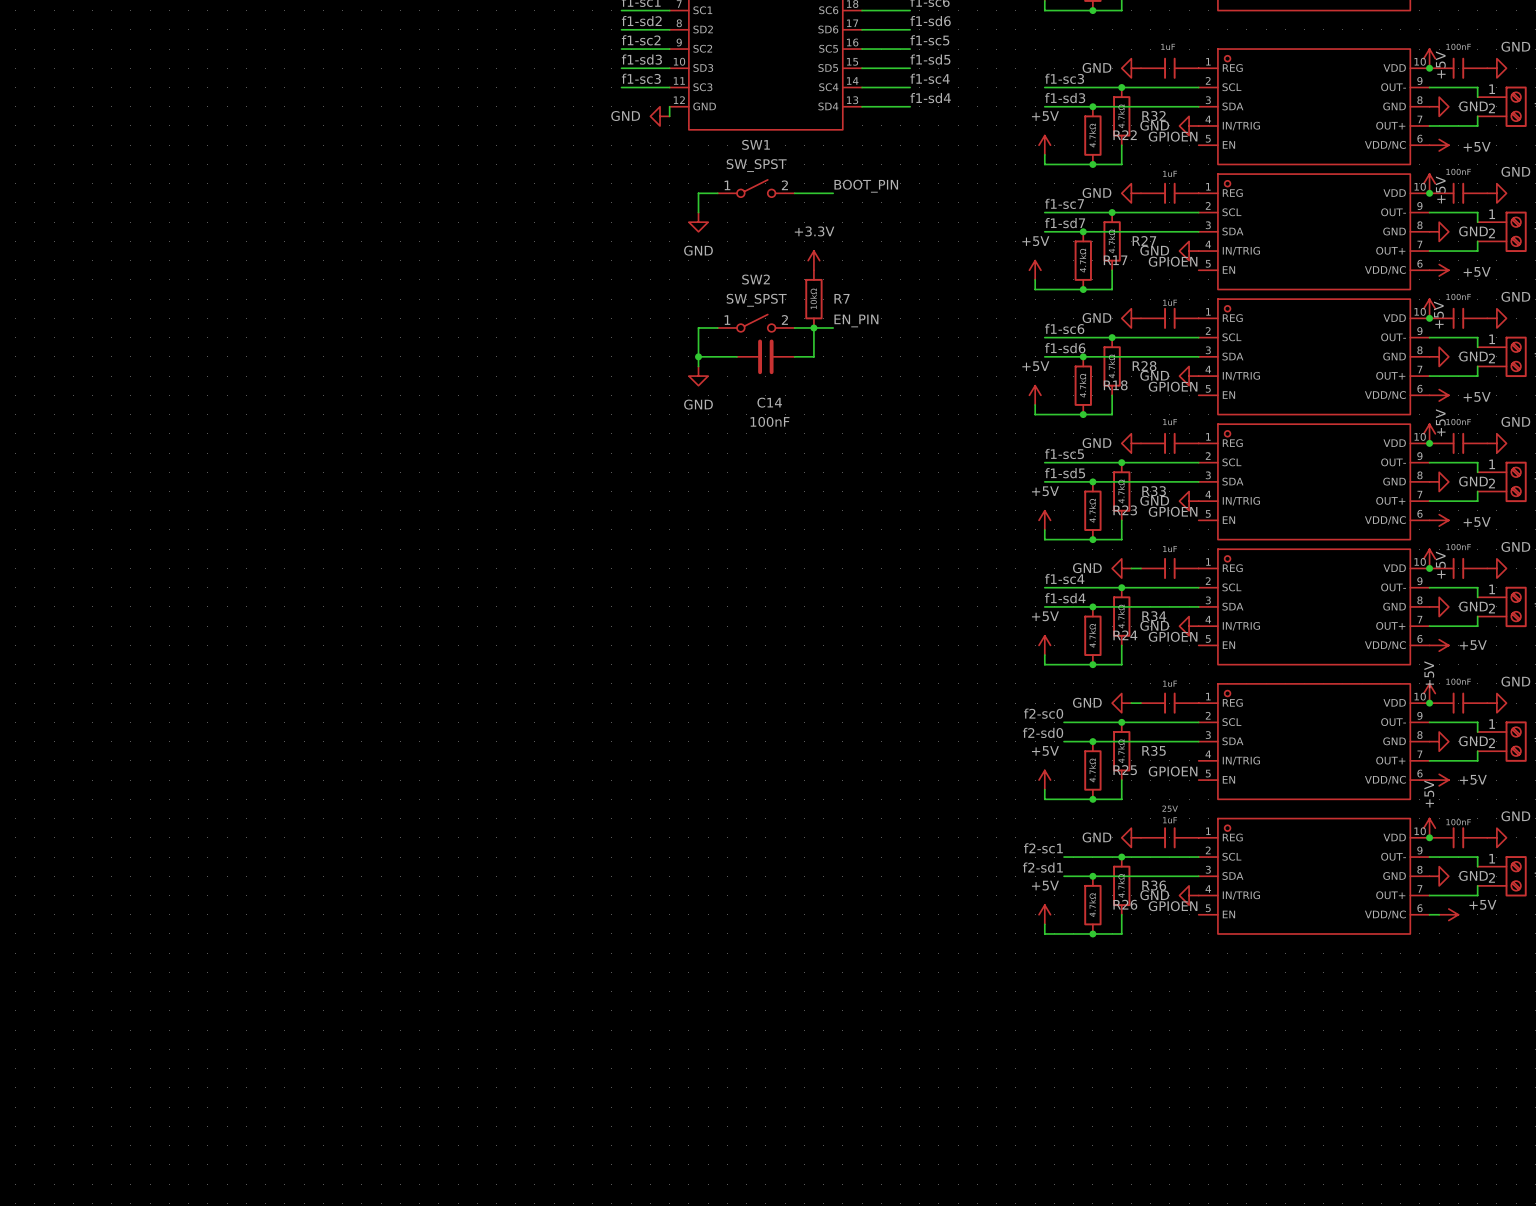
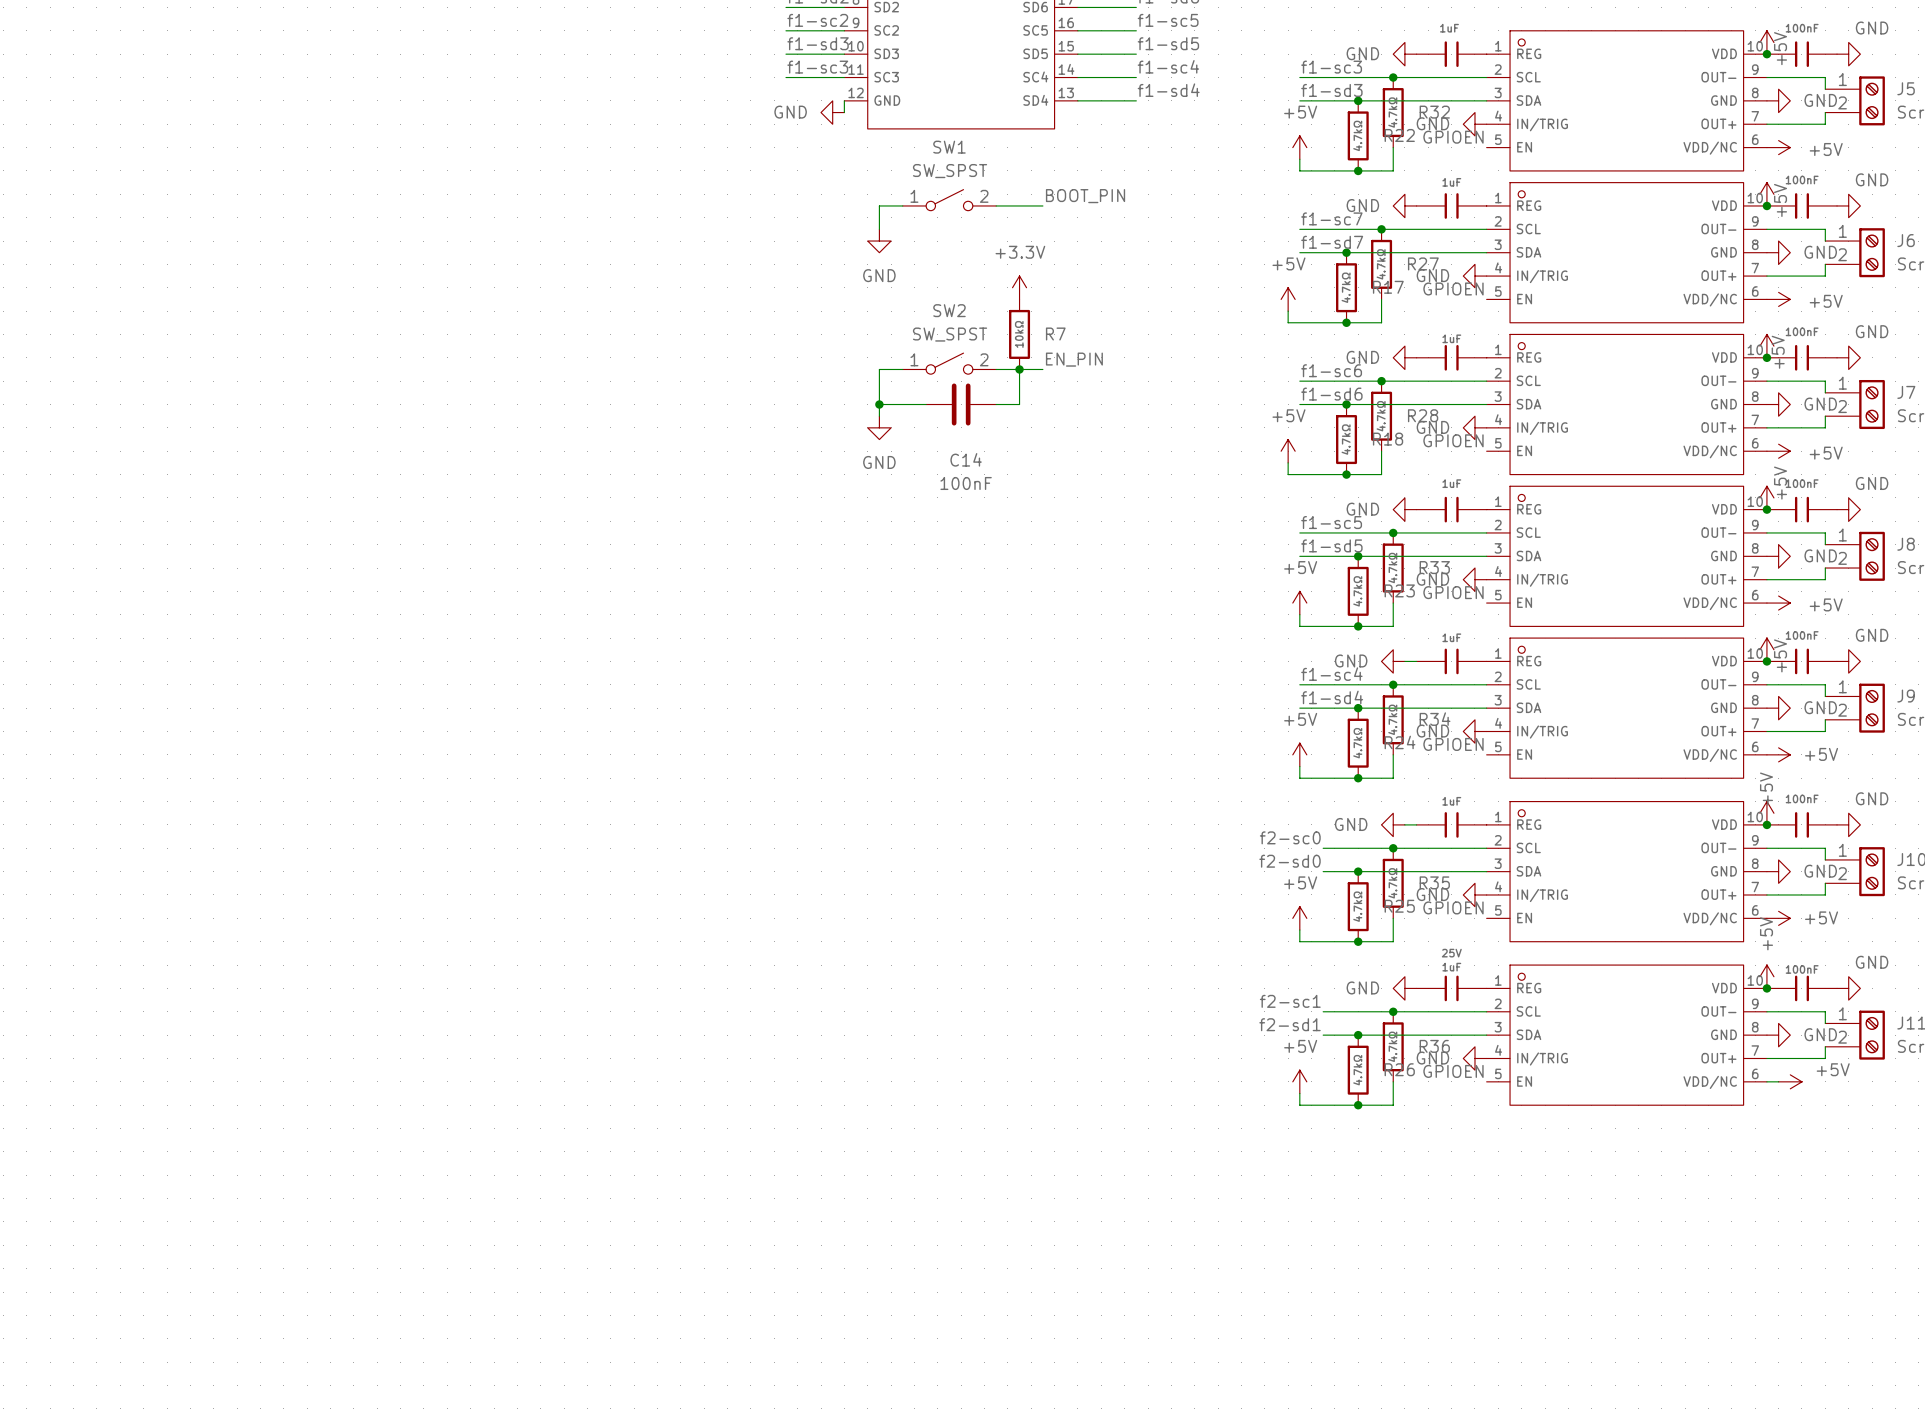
power symbol: none -> GND (1474, 894)

